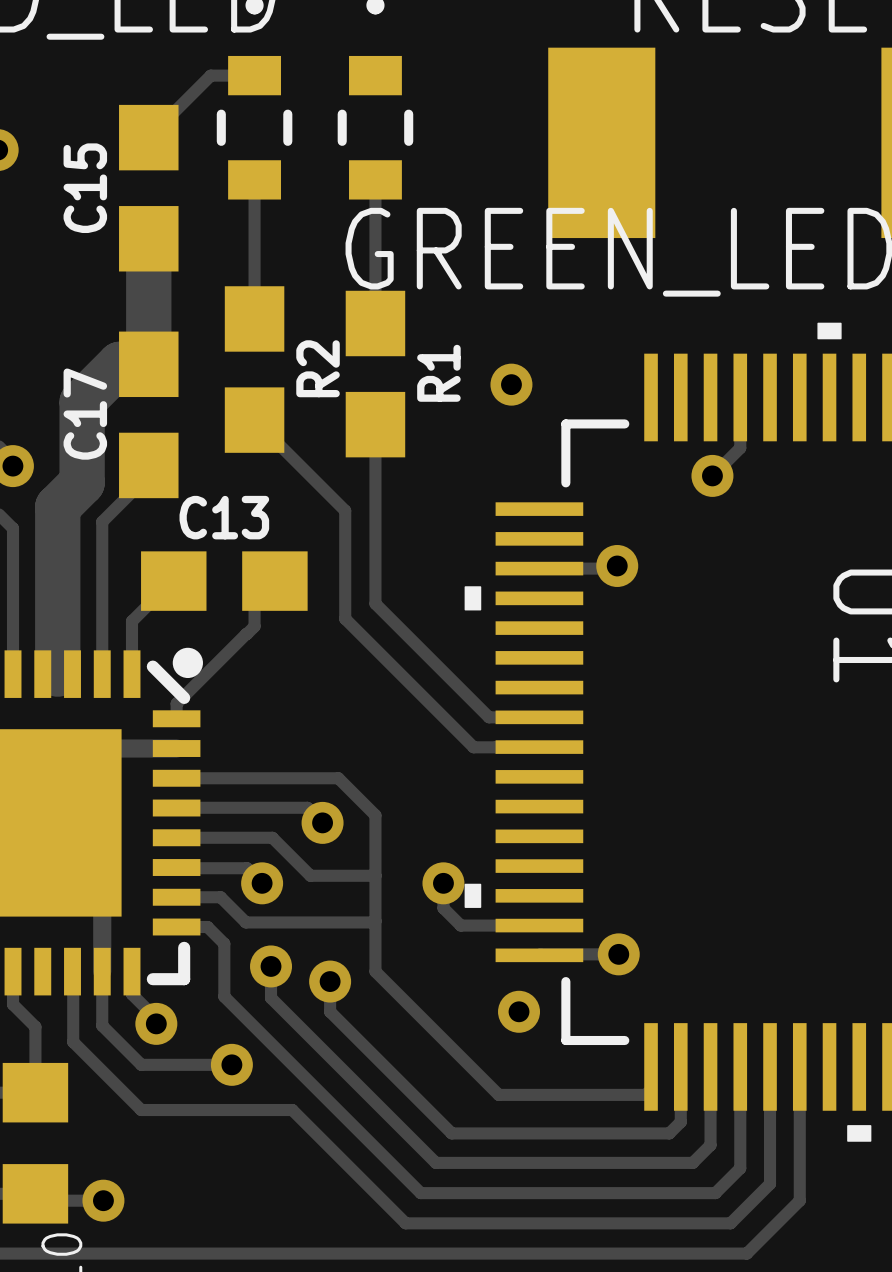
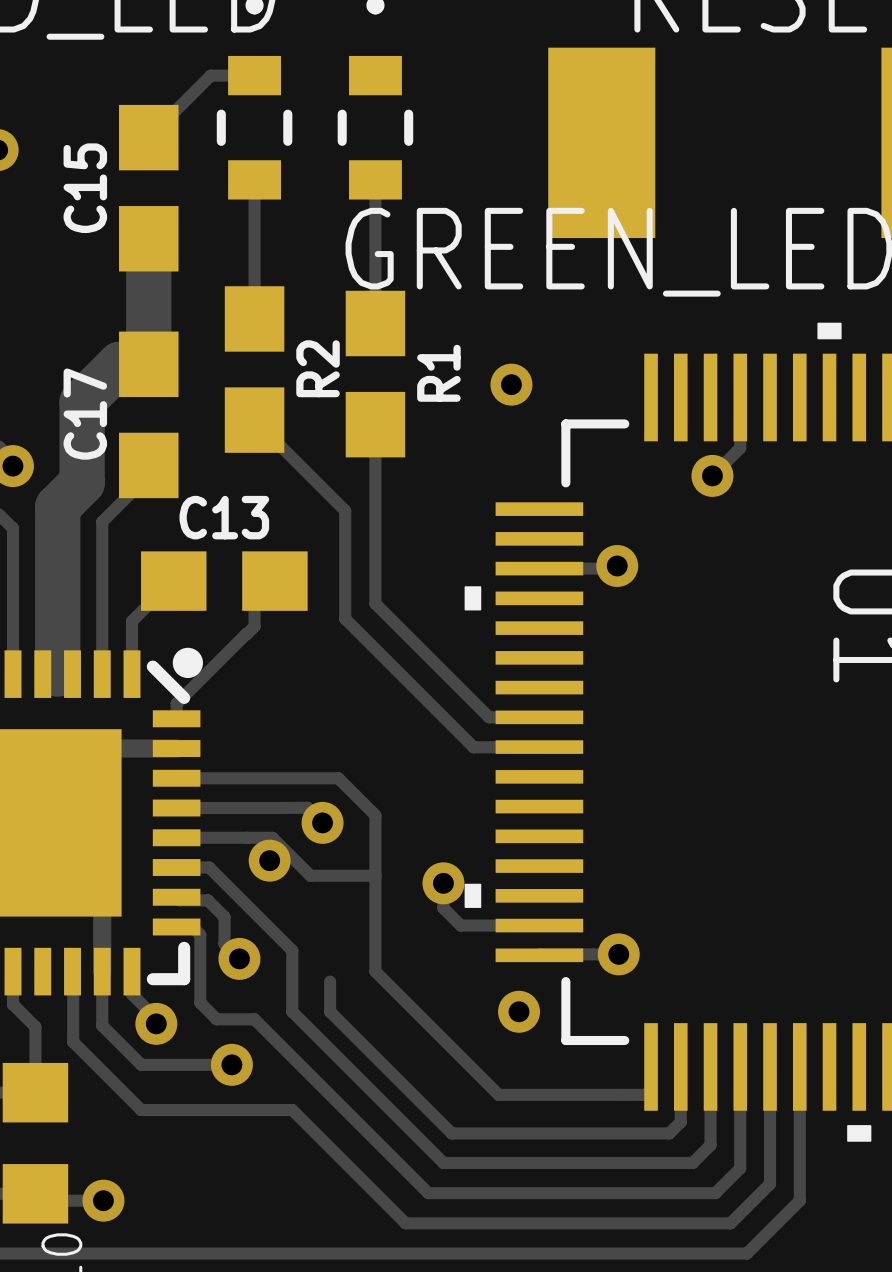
track: (177, 868) (247, 868) (262, 883) -> none
via position: (262, 883) -> (269, 860)
track: (176, 897) (220, 897) (245, 922) (375, 921) -> (176, 897) (179, 900) (207, 900) (224, 916) (224, 943) (239, 958)
track: (192, 927) (207, 927) (224, 943) (224, 996) (420, 1193) (428, 1193) -> (192, 927) (200, 934) (200, 1002) (216, 1019) (254, 1019) (428, 1193)
track: (271, 966) (271, 998) (435, 1162) (443, 1162) -> (176, 867) (209, 867) (292, 950) (292, 1011) (443, 1162)
via position: (271, 966) -> (239, 958)
via: (330, 981) -> none

